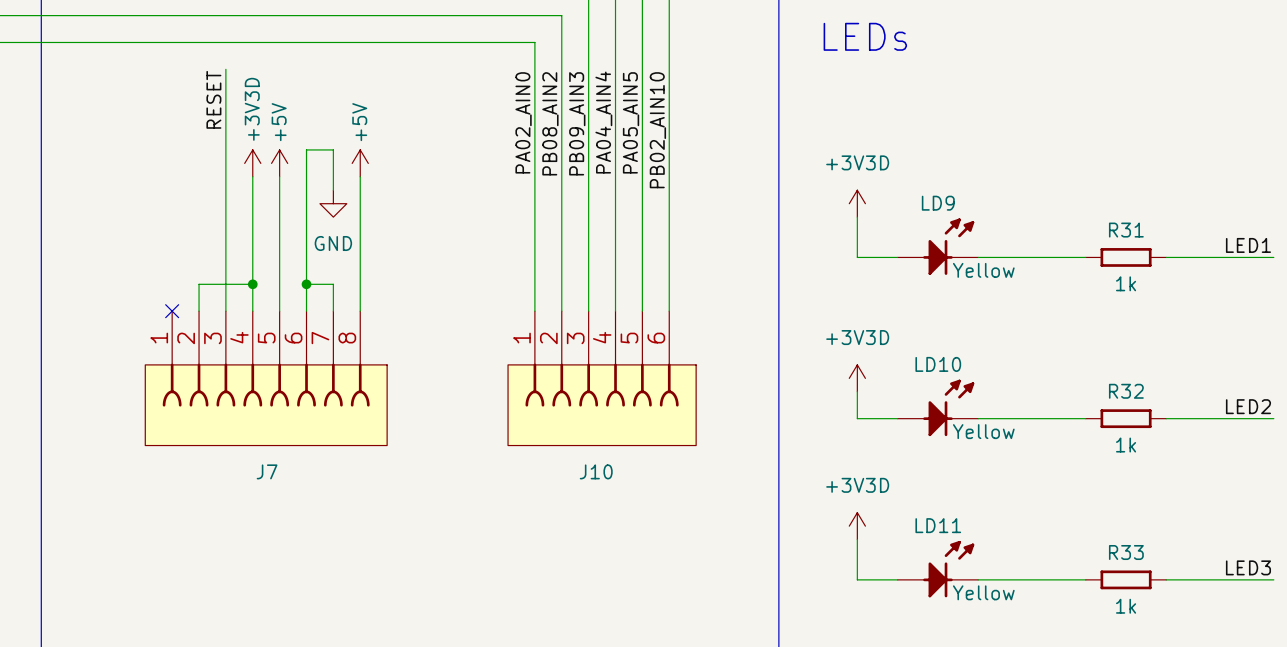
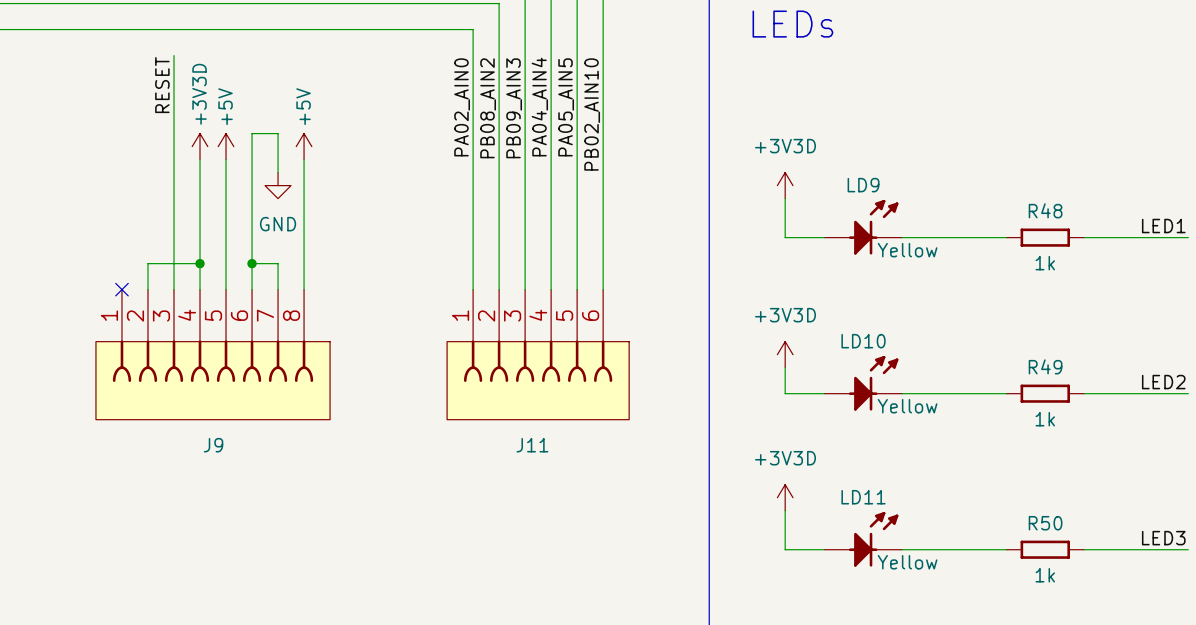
R31 name: R31 (1126, 230) -> R48 (1045, 210)
R32 name: R32 (1126, 391) -> R49 (1045, 366)
J7 name: J7 (267, 471) -> J9 (213, 445)
J10 name: J10 (596, 471) -> J11 (532, 445)
R33 name: R33 (1126, 552) -> R50 (1045, 523)

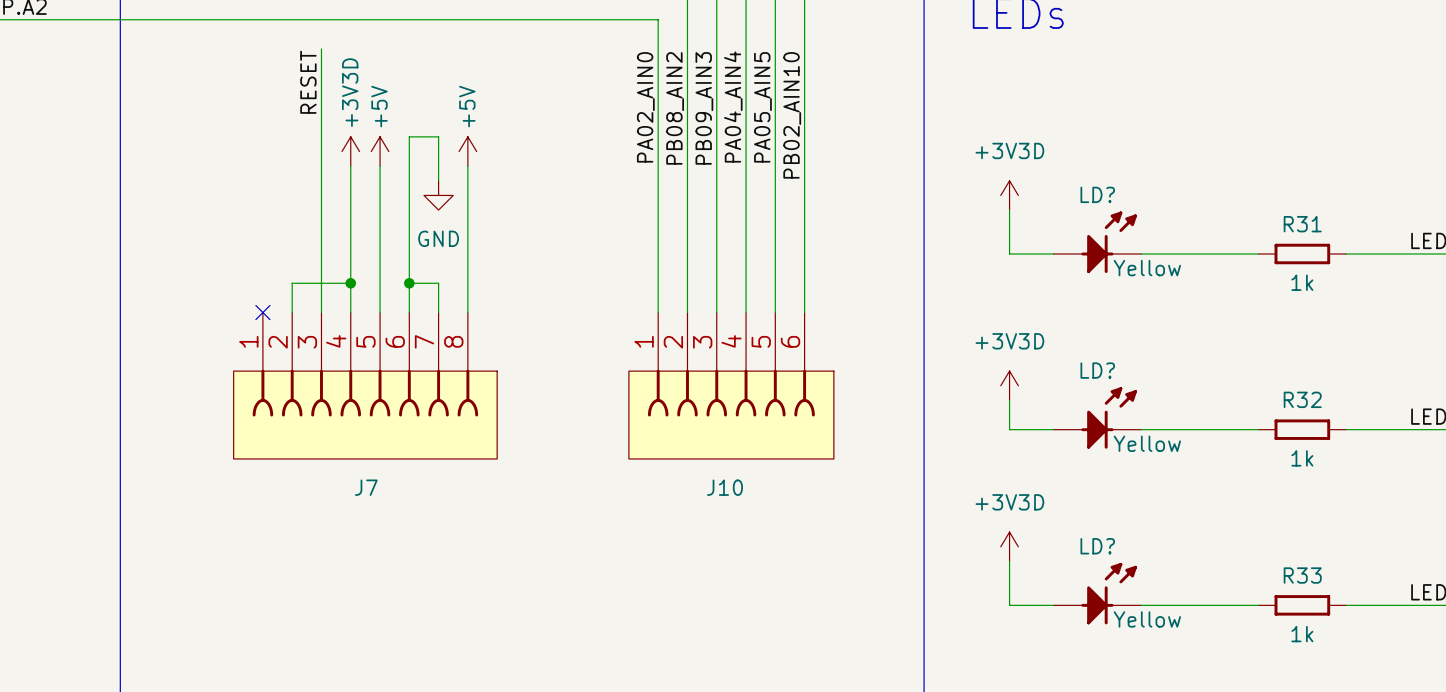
LD9 name: LD9 (863, 185) -> LD? (1097, 194)
R48 name: R48 (1045, 210) -> R31 (1302, 224)
LD10 name: LD10 (863, 341) -> LD? (1097, 370)
R49 name: R49 (1045, 366) -> R32 (1302, 399)
J9 name: J9 (213, 445) -> J7 (366, 487)
J11 name: J11 (532, 445) -> J10 (725, 487)
LD11 name: LD11 (863, 497) -> LD? (1097, 546)
R50 name: R50 (1045, 523) -> R33 (1302, 575)

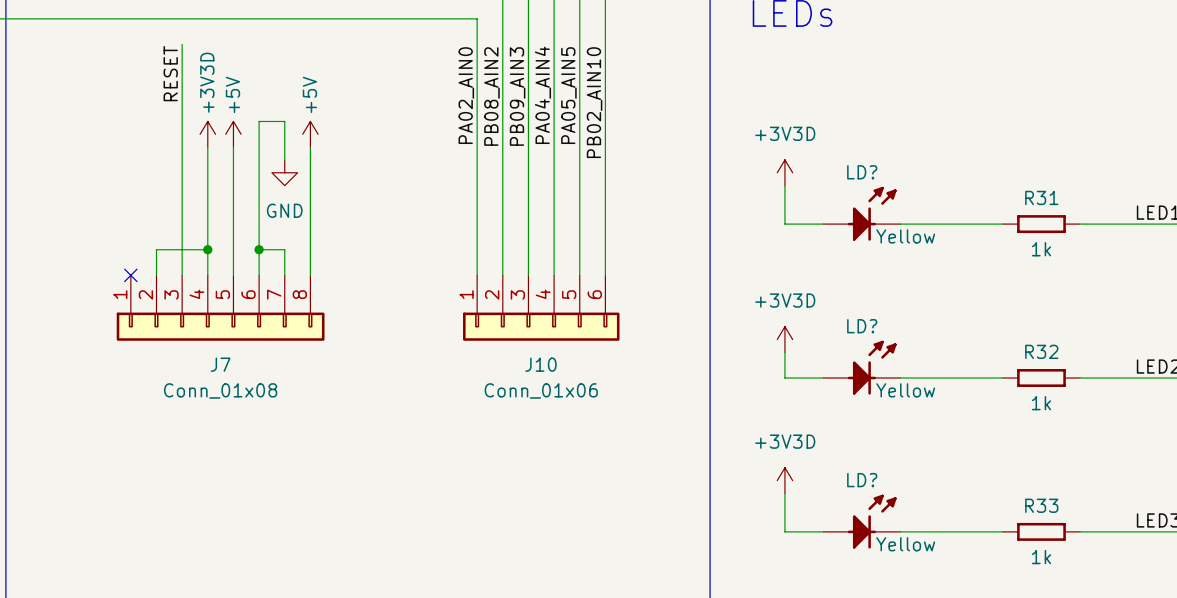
J7 symbol: [233, 312, 498, 459] -> [116, 275, 325, 341]
J10 symbol: [628, 312, 834, 459] -> [463, 275, 620, 341]
J7 value: none -> Conn_01x08 (220, 390)
J10 value: none -> Conn_01x06 (541, 390)
J7 name position: J7 (366, 487) -> J7 (220, 364)
J10 name position: J10 (725, 487) -> J10 (540, 364)

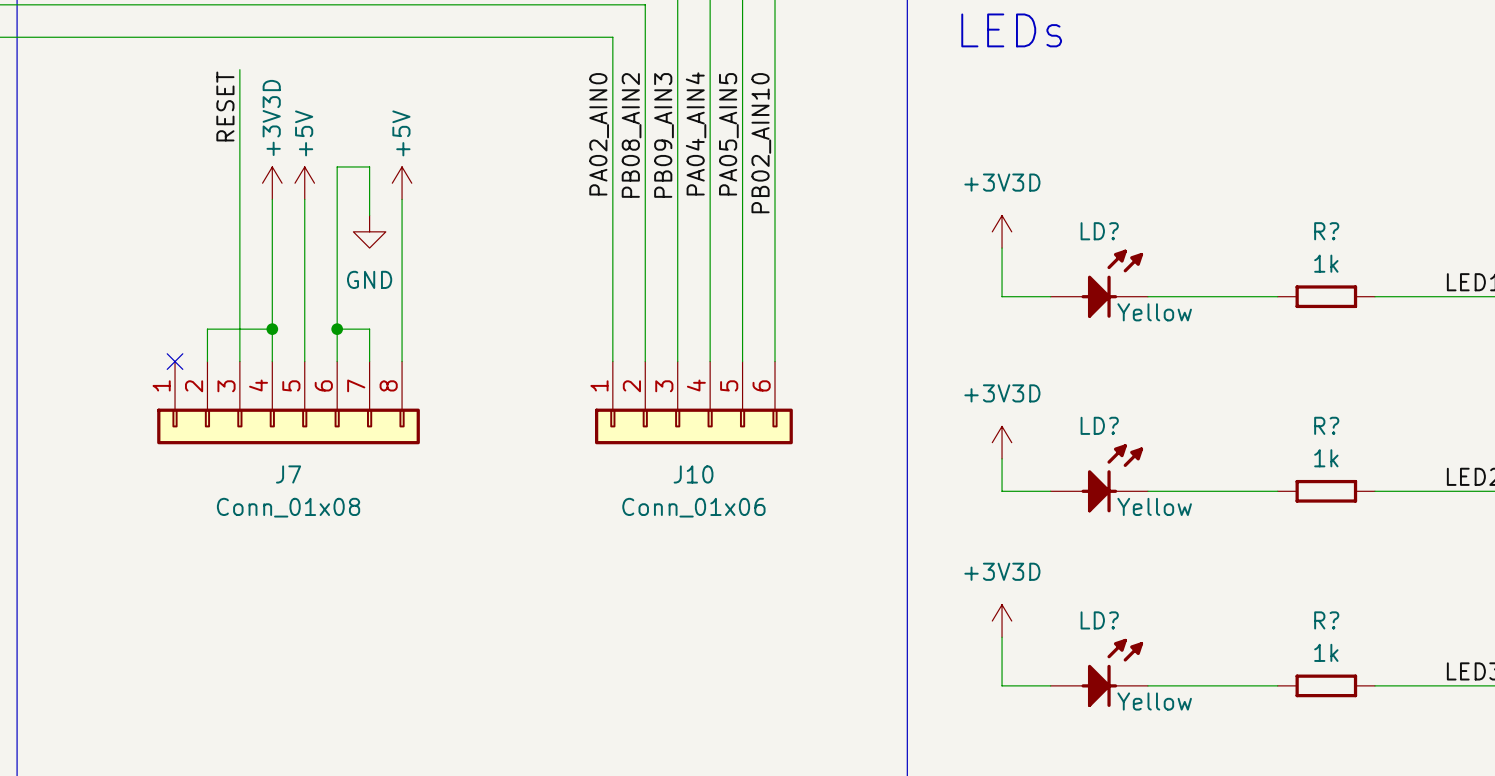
R31 name: R31 (1041, 197) -> R? (1326, 231)
R31 text position: 1k (1041, 249) -> 1k (1326, 263)
R32 name: R32 (1041, 351) -> R? (1326, 425)
R32 text position: 1k (1041, 403) -> 1k (1326, 458)
R33 name: R33 (1041, 505) -> R? (1326, 620)
R33 text position: 1k (1041, 557) -> 1k (1326, 652)

